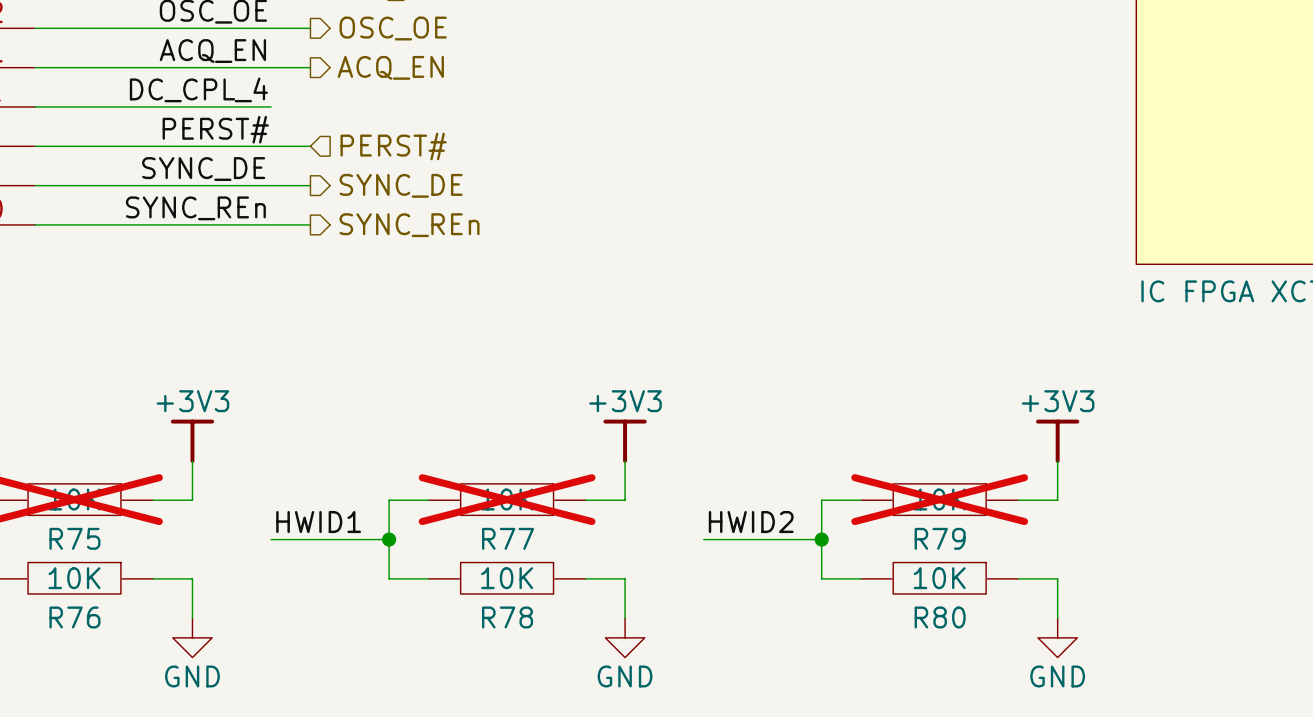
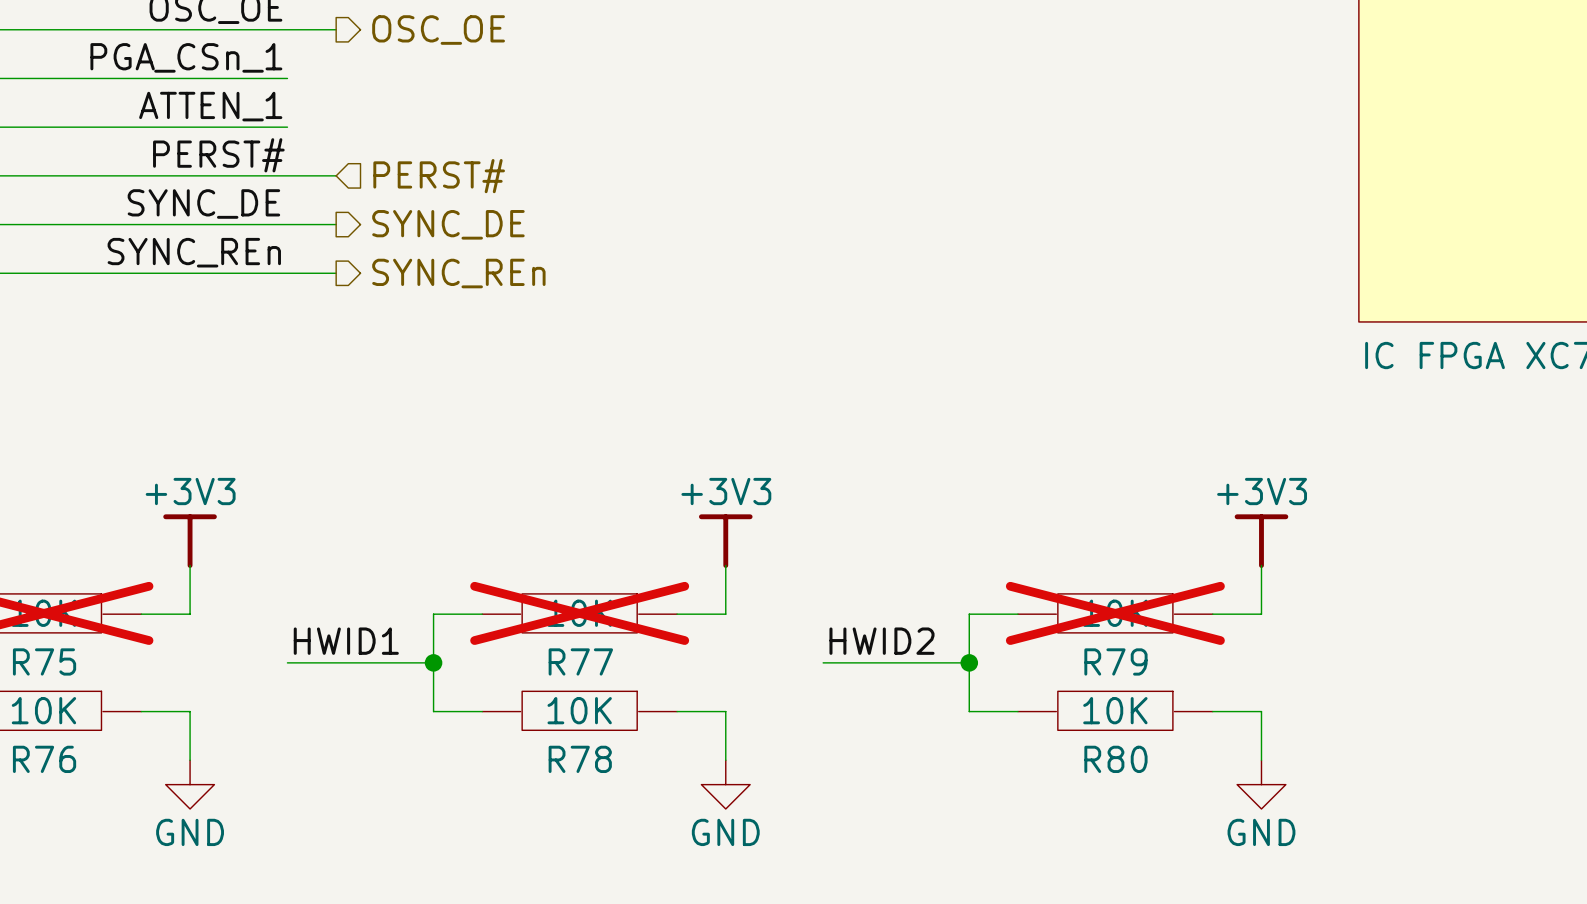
label: ACQ_EN (212, 51) -> PGA_CSn_1 (186, 57)
wire: (271, 67) (310, 67) -> none
hierarchical label: ACQ_EN (390, 67) -> none
label: DC_CPL_4 (198, 89) -> ATTEN_1 (210, 106)

